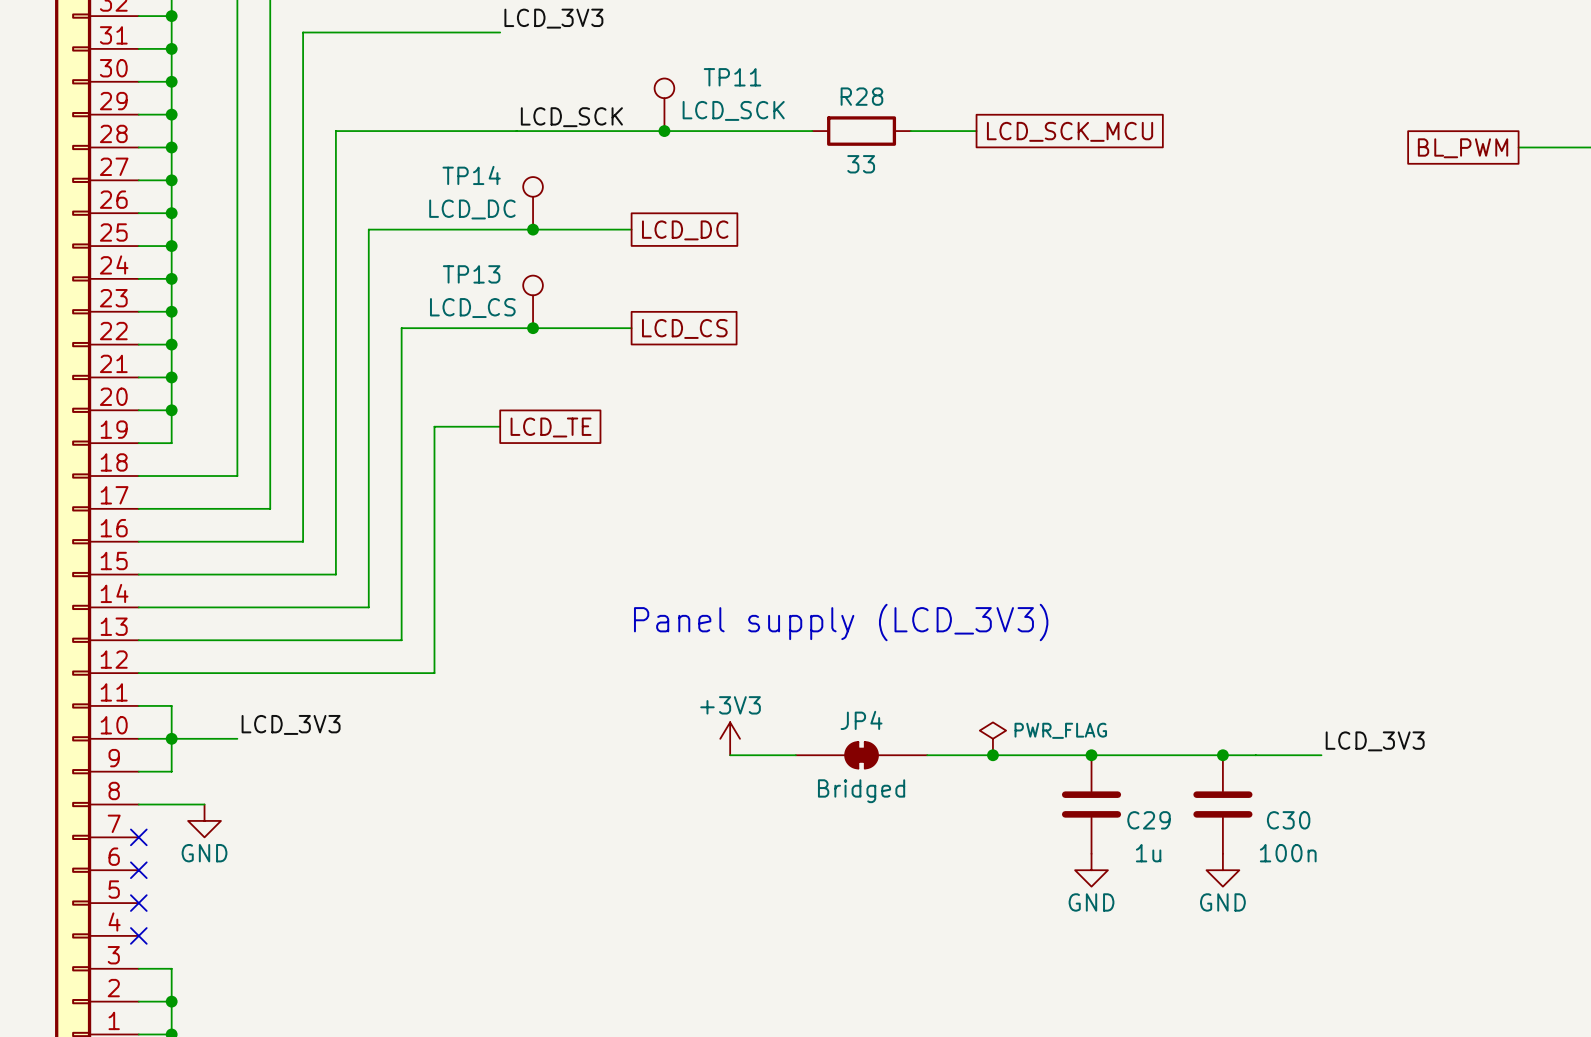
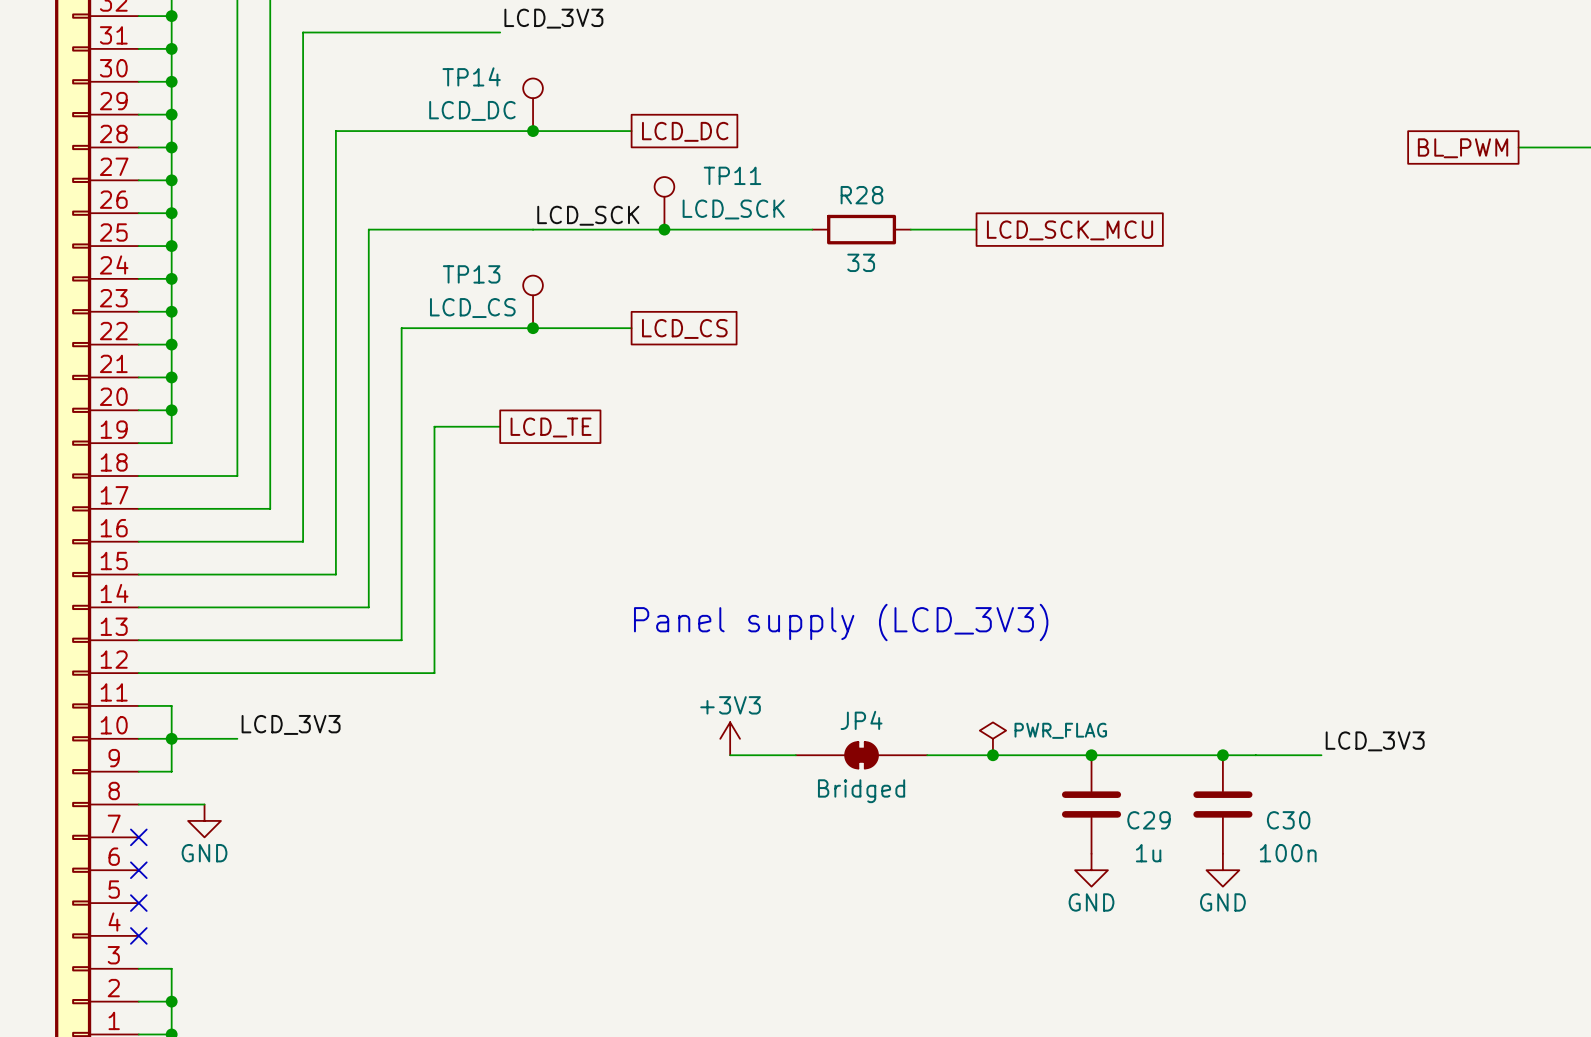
TP11 position: (664, 104) -> (664, 203)
label position: LCD_SCK (571, 117) -> LCD_SCK (588, 215)
junction: none -> (533, 131)
wire: (631, 131) (812, 131) -> (631, 229) (812, 229)
junction: (664, 131) -> none
R28 position: (861, 131) -> (861, 229)
wire: (910, 131) (976, 131) -> (910, 229) (976, 229)
global label position: LCD_SCK_MCU (1070, 131) -> LCD_SCK_MCU (1070, 230)
TP14 position: (533, 203) -> (533, 104)
junction: (533, 229) -> none
junction: none -> (664, 229)
global label position: LCD_DC (685, 230) -> LCD_DC (685, 131)

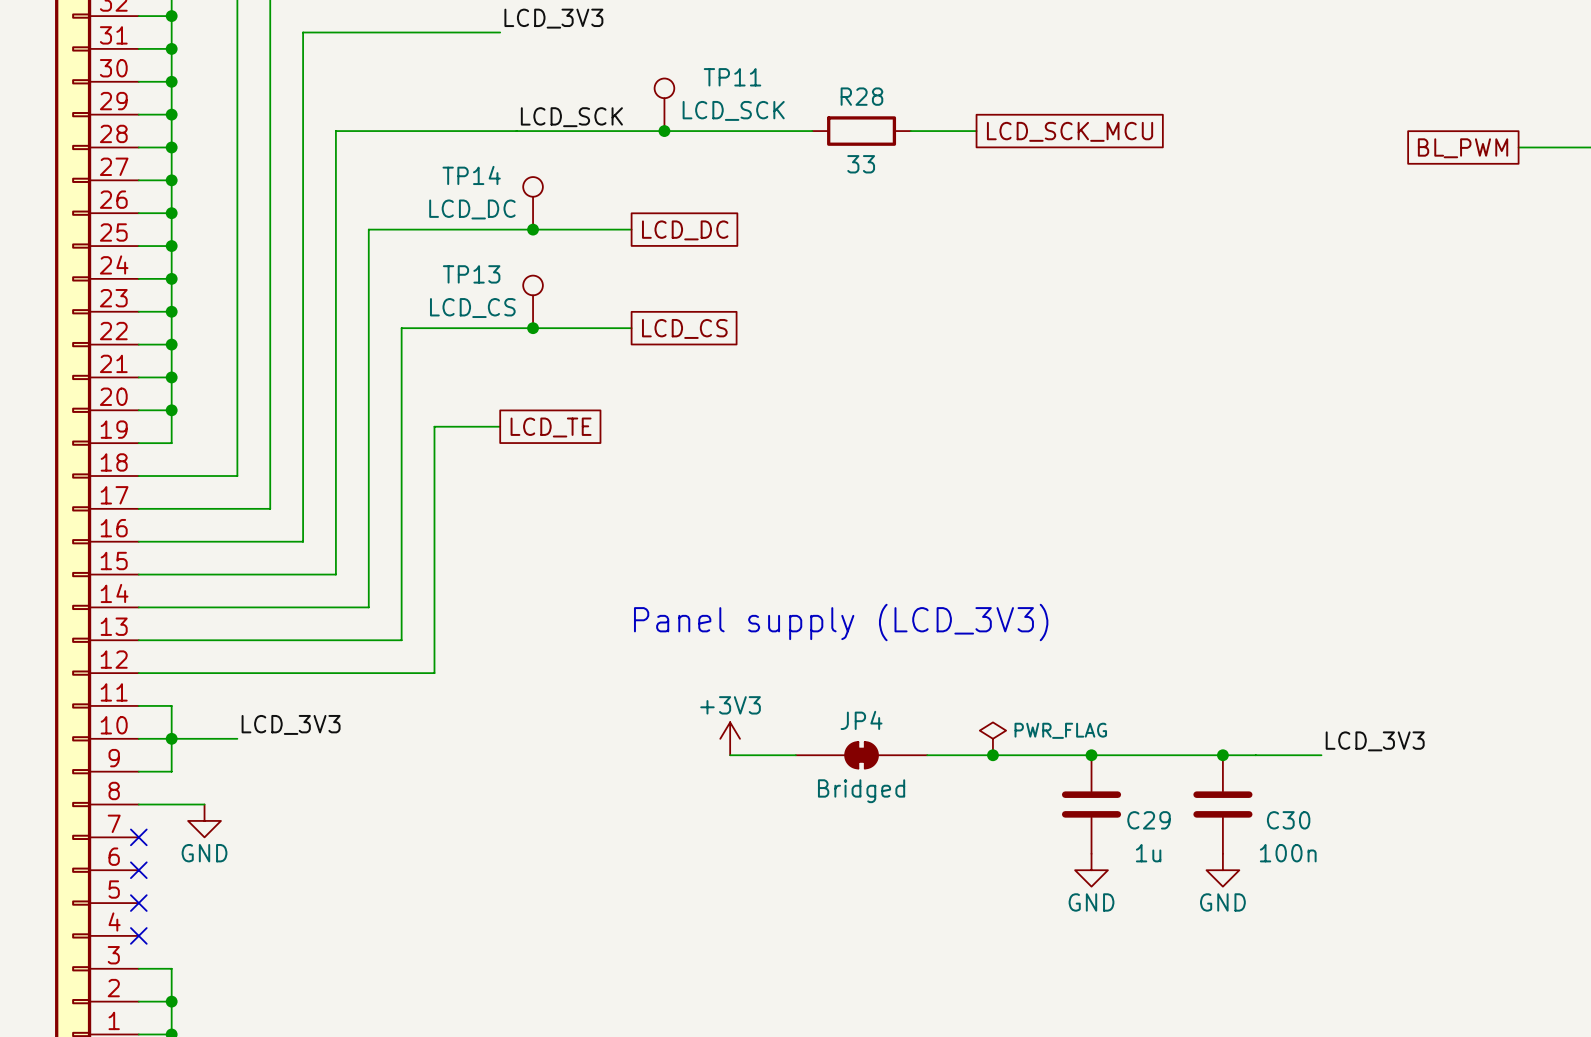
TP14 position: (533, 104) -> (533, 203)
junction: (533, 131) -> none
junction: none -> (664, 131)
global label position: LCD_DC (685, 131) -> LCD_DC (685, 230)
TP11 position: (664, 203) -> (664, 104)
label position: LCD_SCK (588, 215) -> LCD_SCK (571, 117)
junction: none -> (533, 229)
wire: (631, 229) (812, 229) -> (631, 131) (812, 131)
junction: (664, 229) -> none
R28 position: (861, 229) -> (861, 131)
wire: (910, 229) (976, 229) -> (910, 131) (976, 131)
global label position: LCD_SCK_MCU (1070, 230) -> LCD_SCK_MCU (1070, 131)

